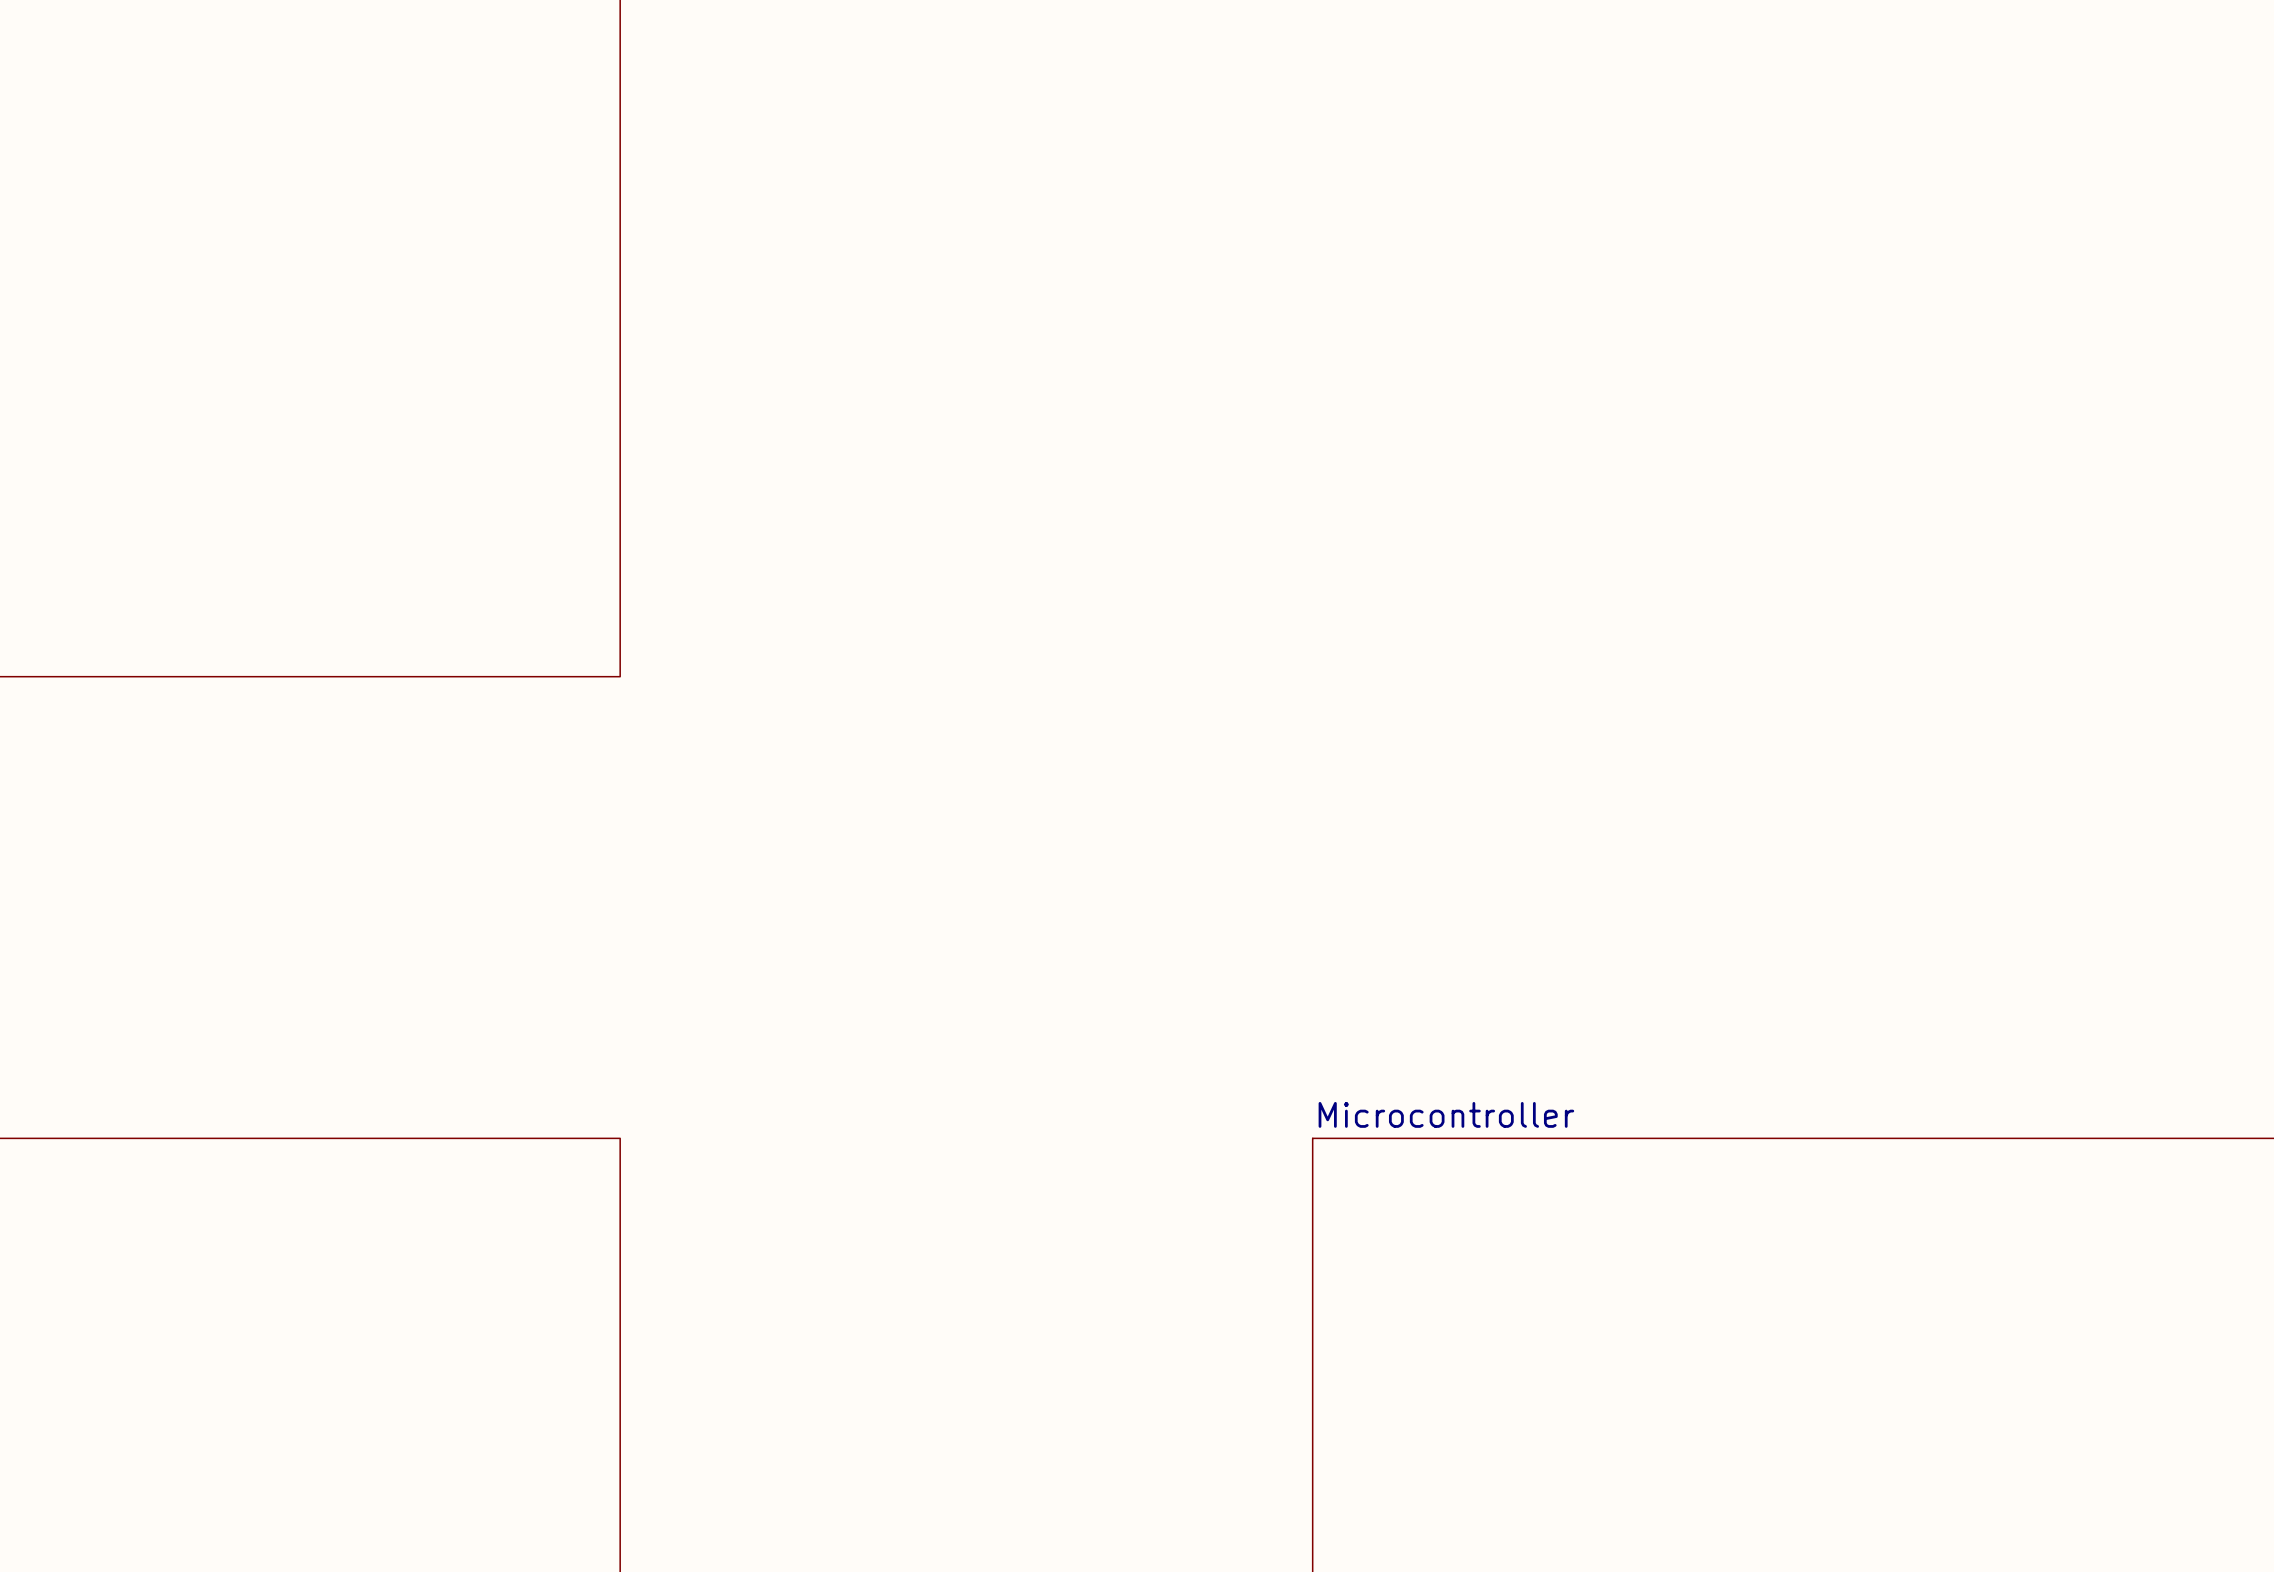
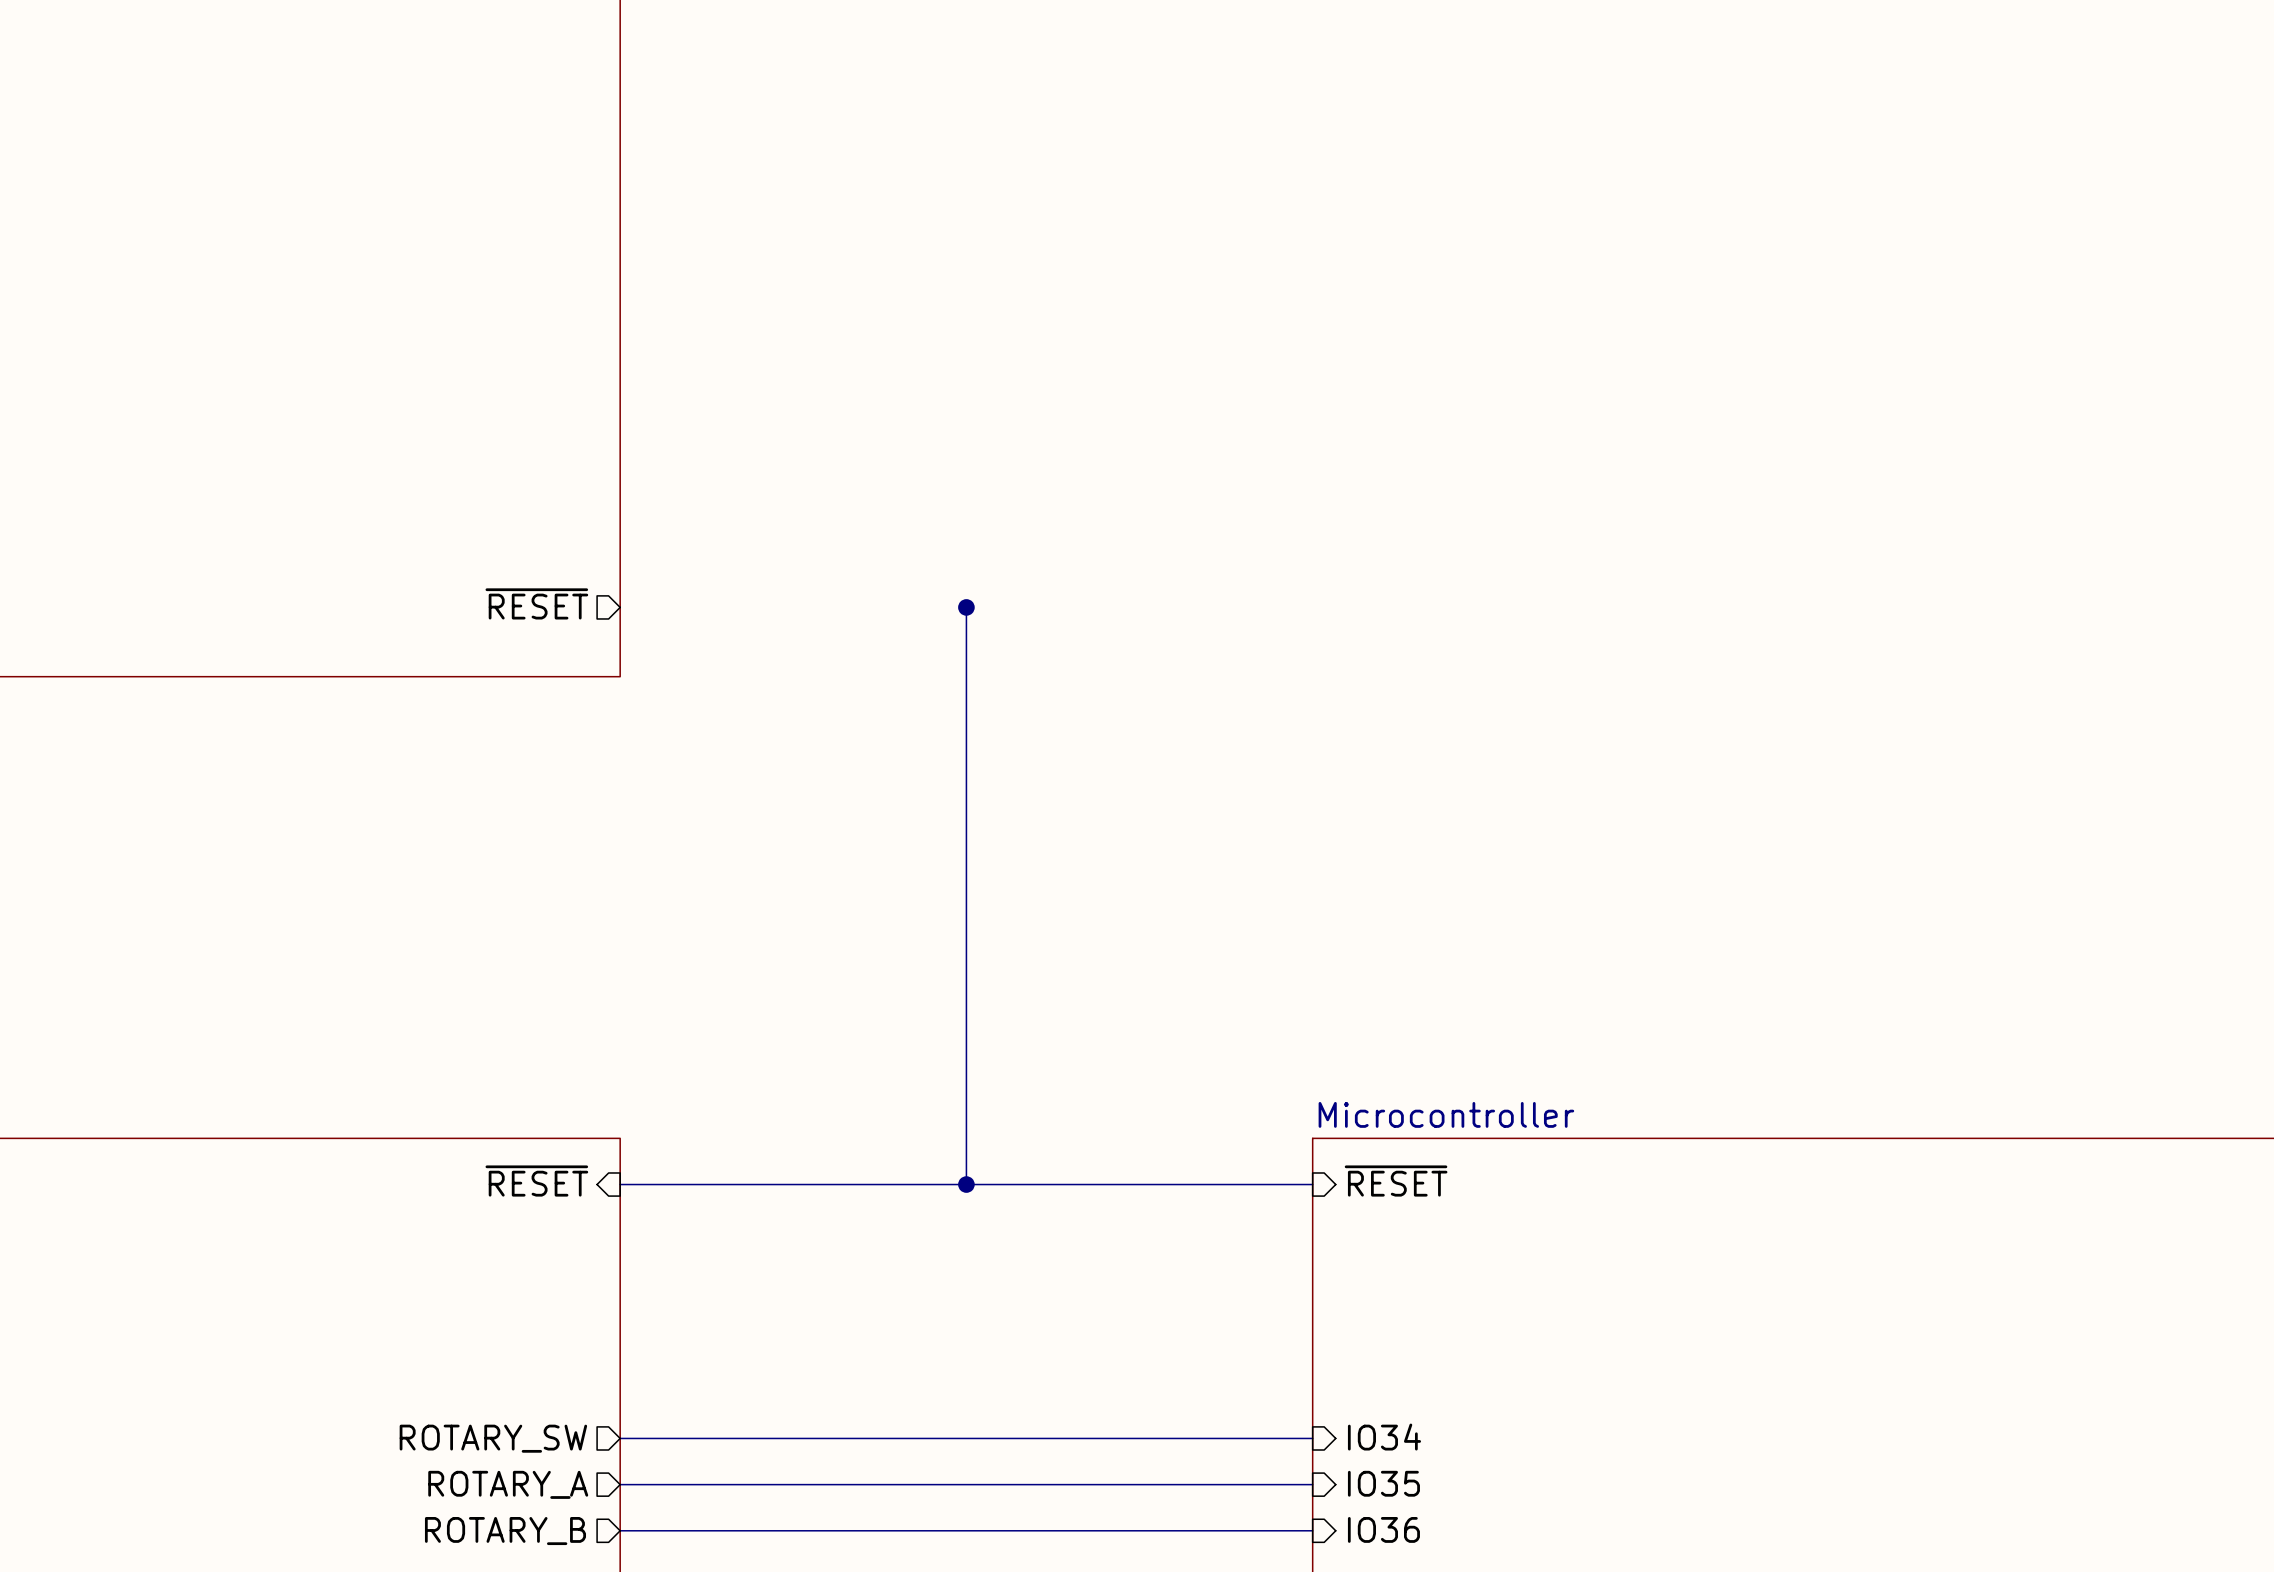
sheet pin: none -> ~{RESET} (536, 603)
wire: none -> (966, 607) (966, 1184)
junction: none -> (966, 607)
sheet pin: none -> ~{RESET} (536, 1181)
sheet pin: none -> ~{RESET} (1396, 1181)
wire: none -> (620, 1184) (1312, 1184)
junction: none -> (966, 1184)
sheet pin: none -> IO34 (1384, 1437)
sheet pin: none -> ROTARY_SW (493, 1438)
wire: none -> (620, 1438) (1312, 1438)
sheet pin: none -> IO35 (1383, 1483)
sheet pin: none -> ROTARY_A (508, 1484)
wire: none -> (620, 1484) (1312, 1484)
sheet pin: none -> IO36 (1383, 1529)
wire: none -> (620, 1530) (1312, 1530)
sheet pin: none -> ROTARY_B (505, 1531)

